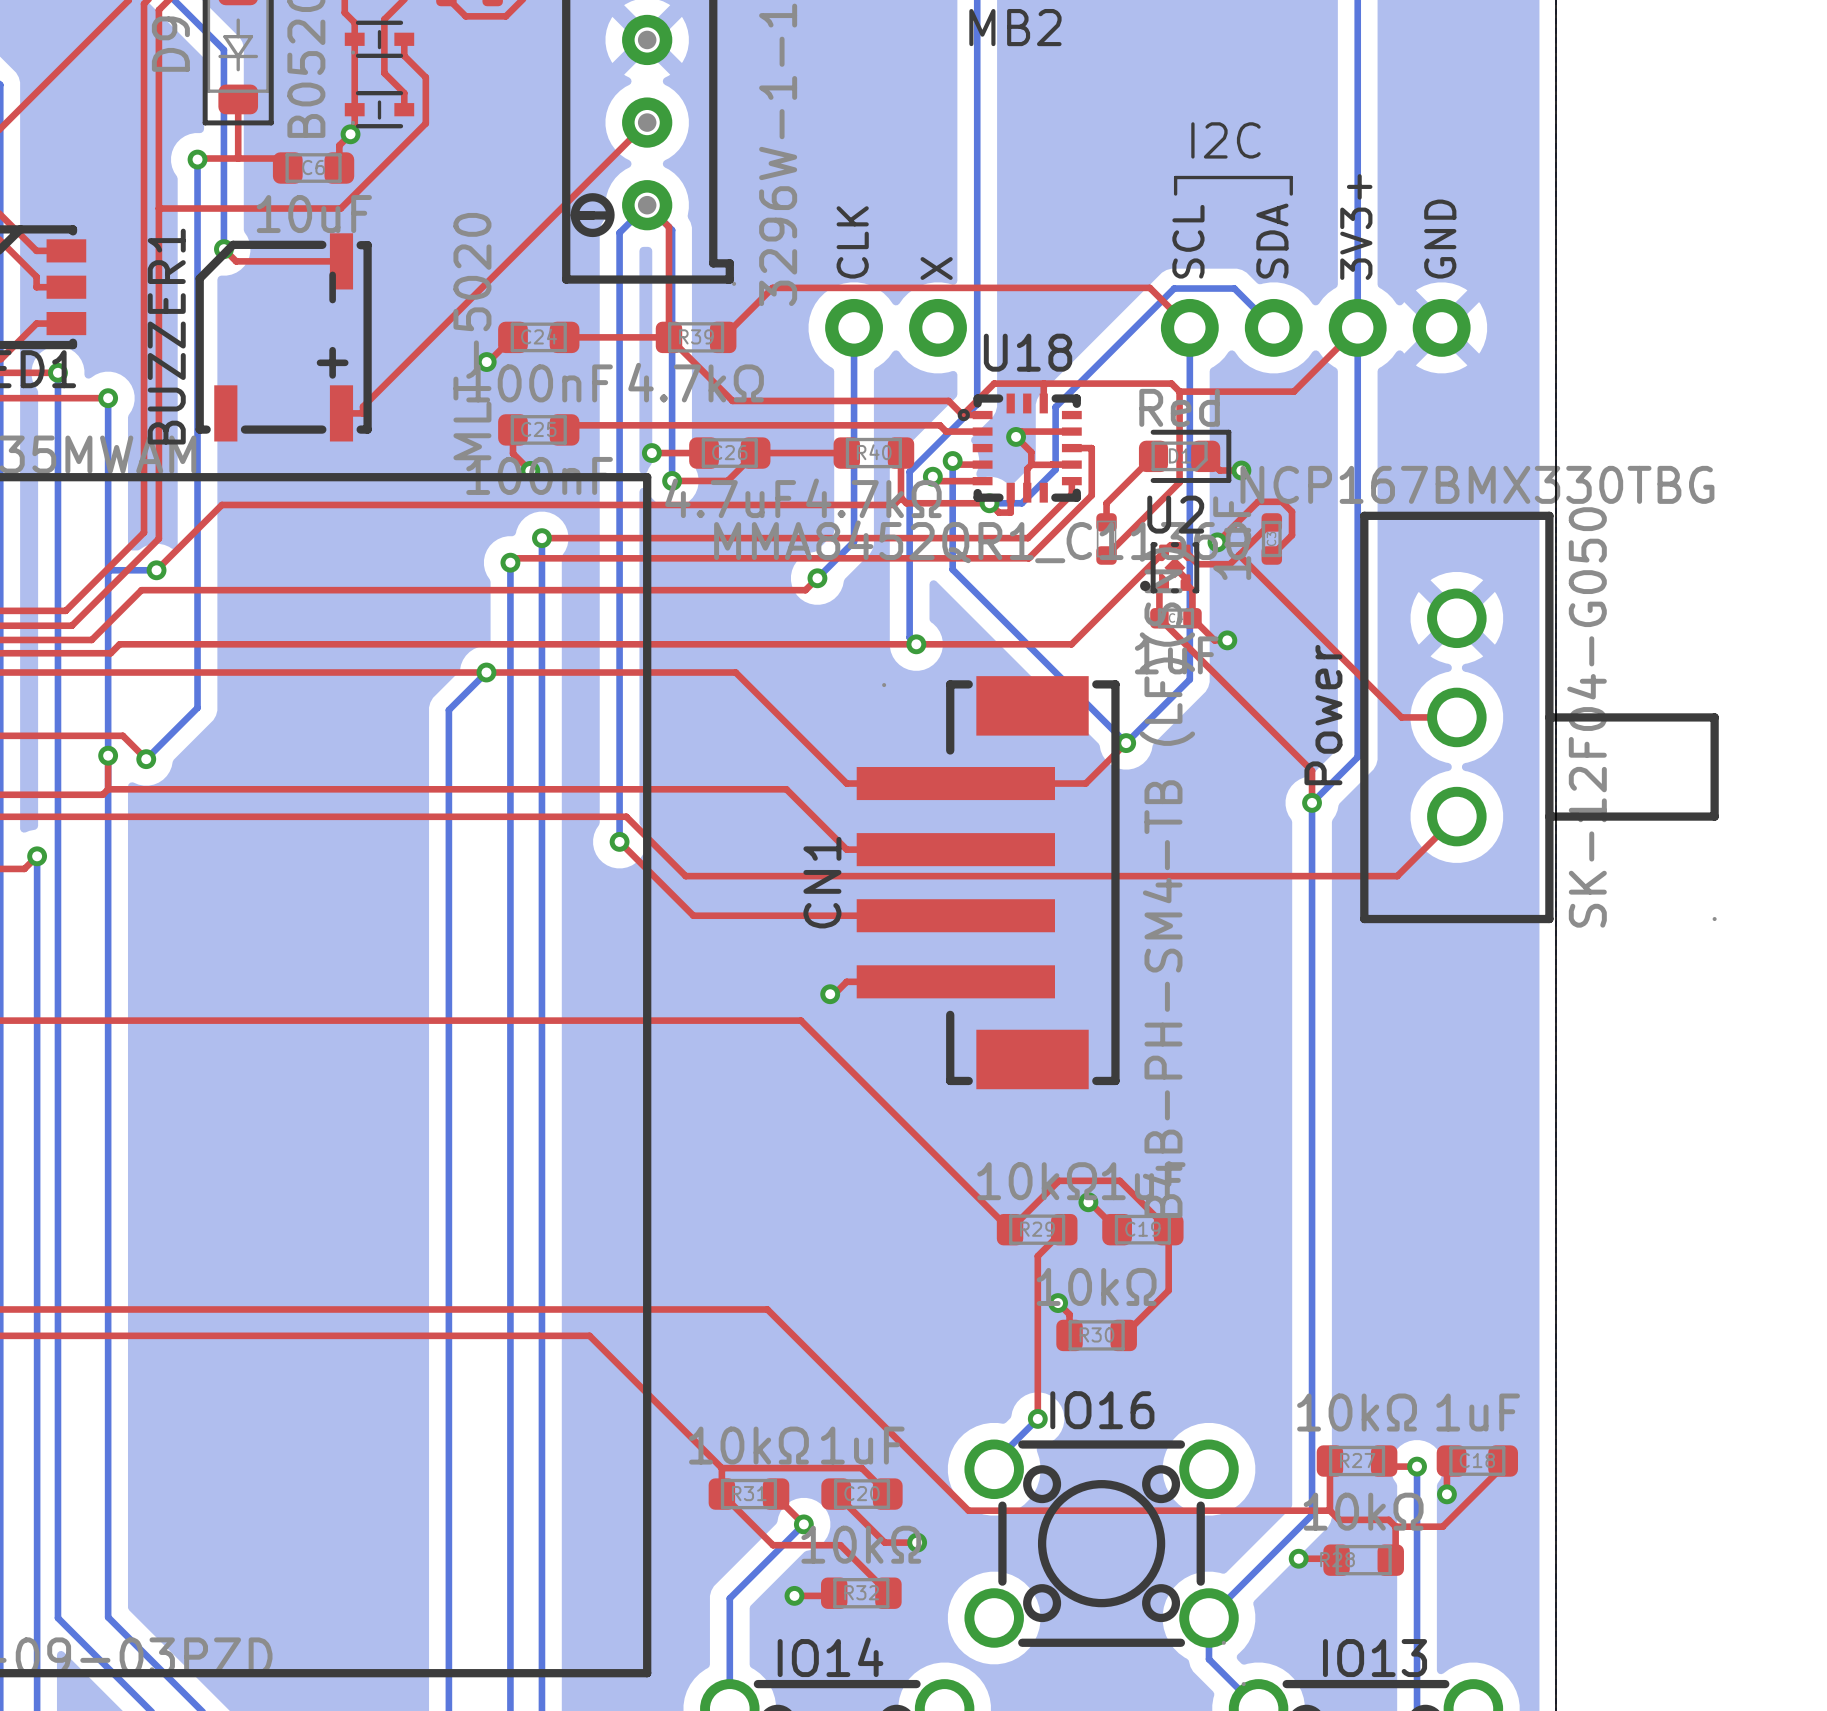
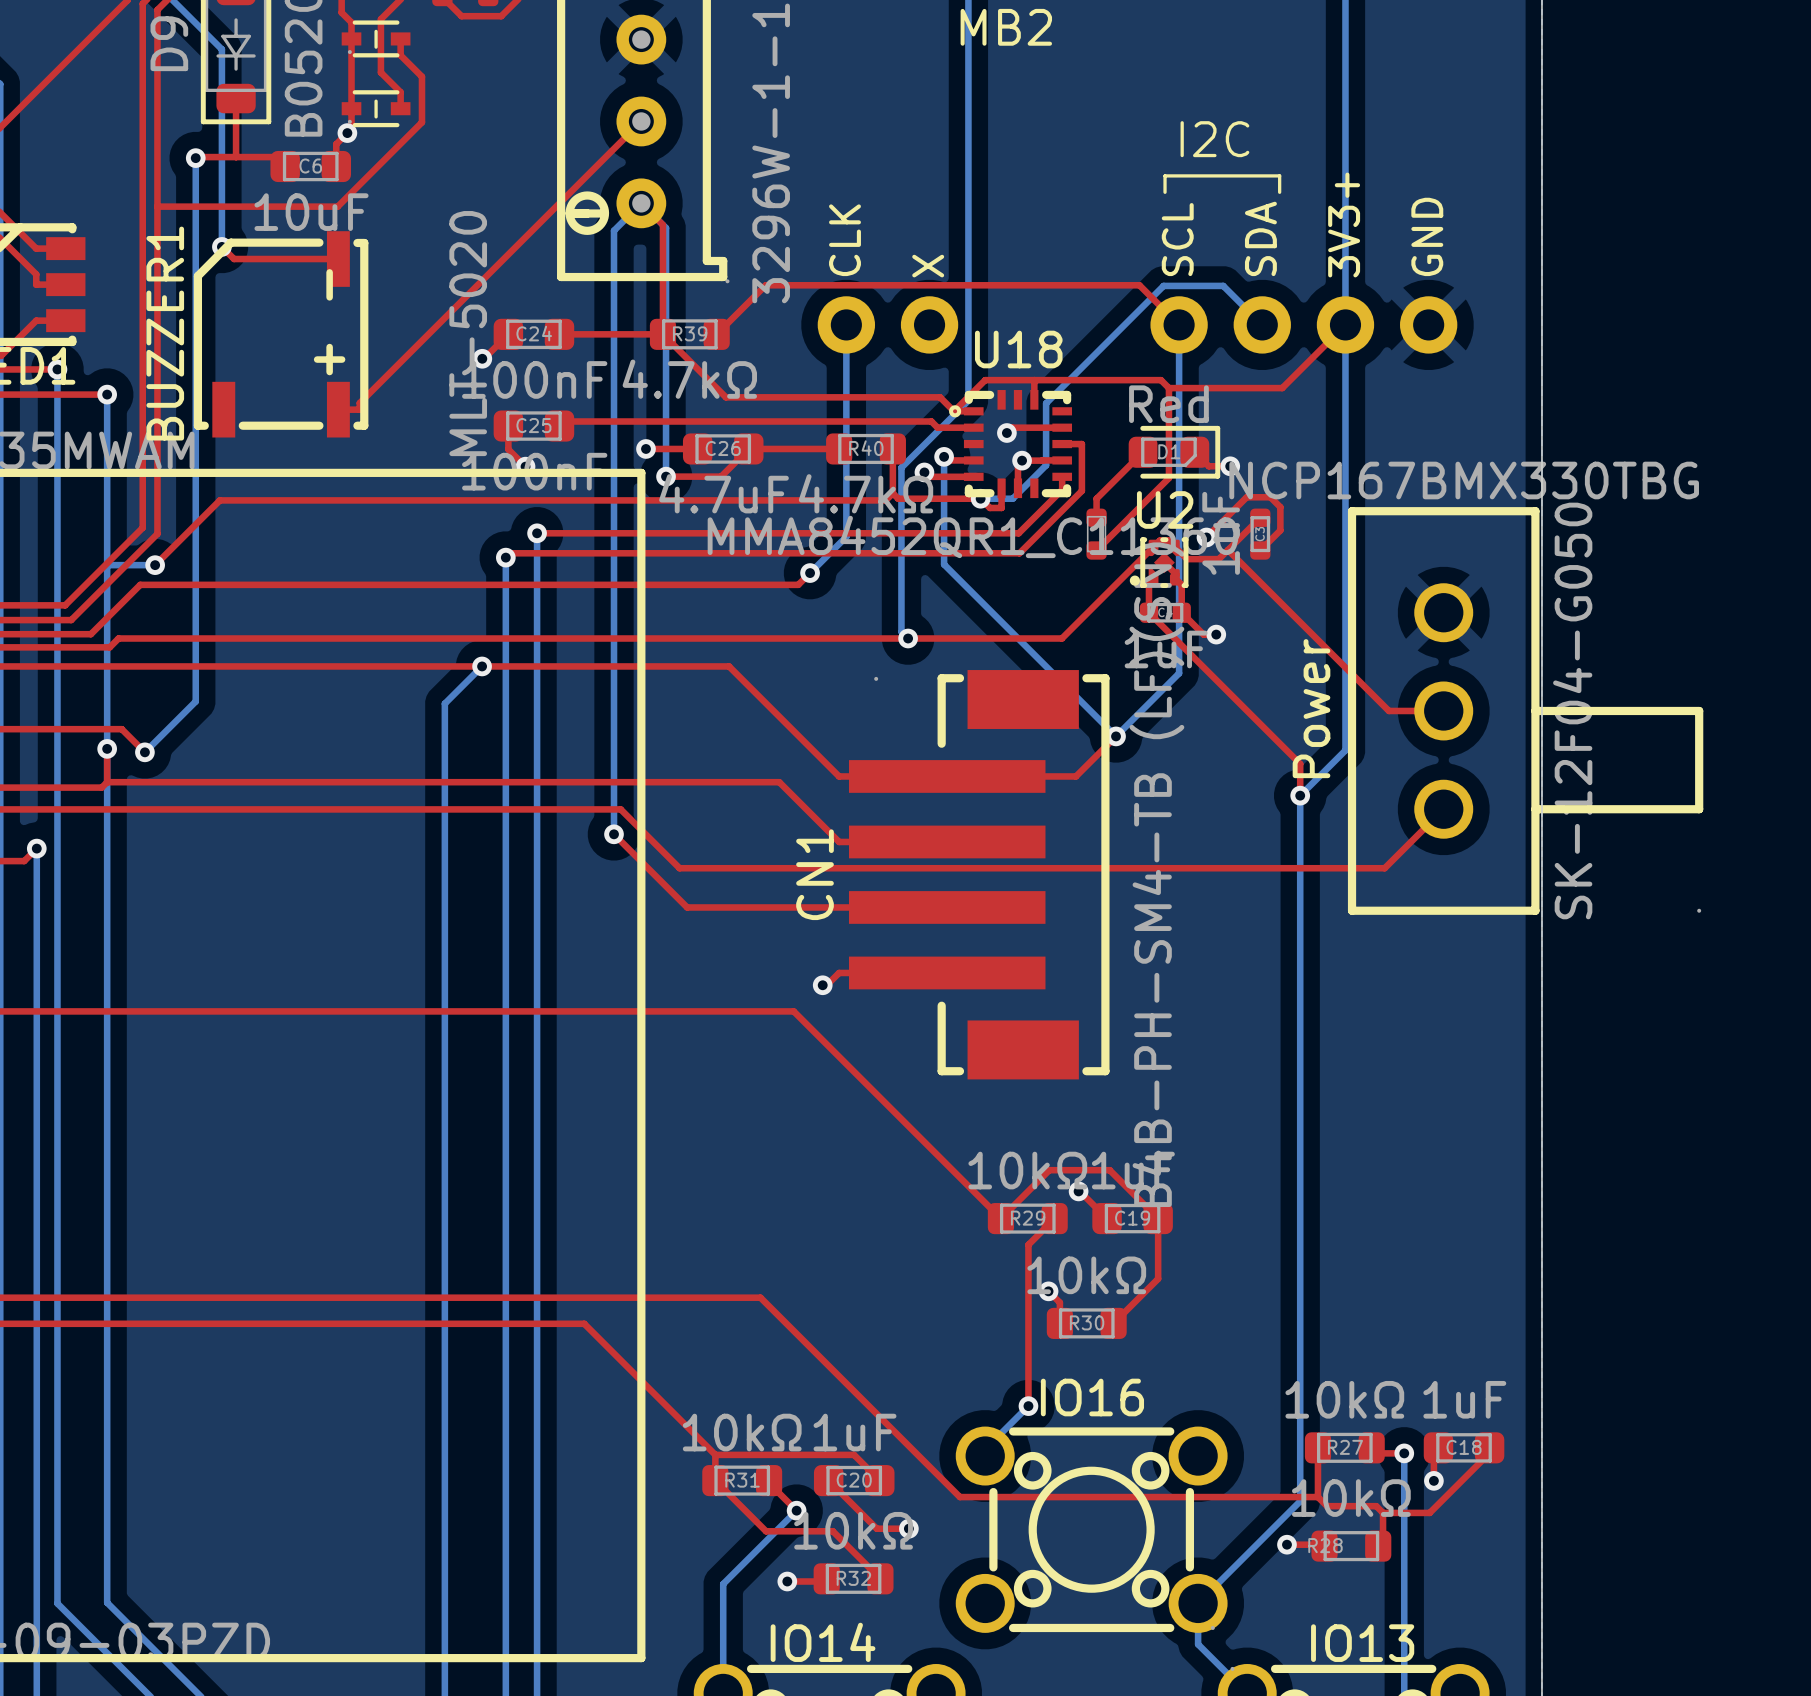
top track: (1016, 436) (1031, 452) (1031, 464) -> none
via: none -> (1022, 460)

